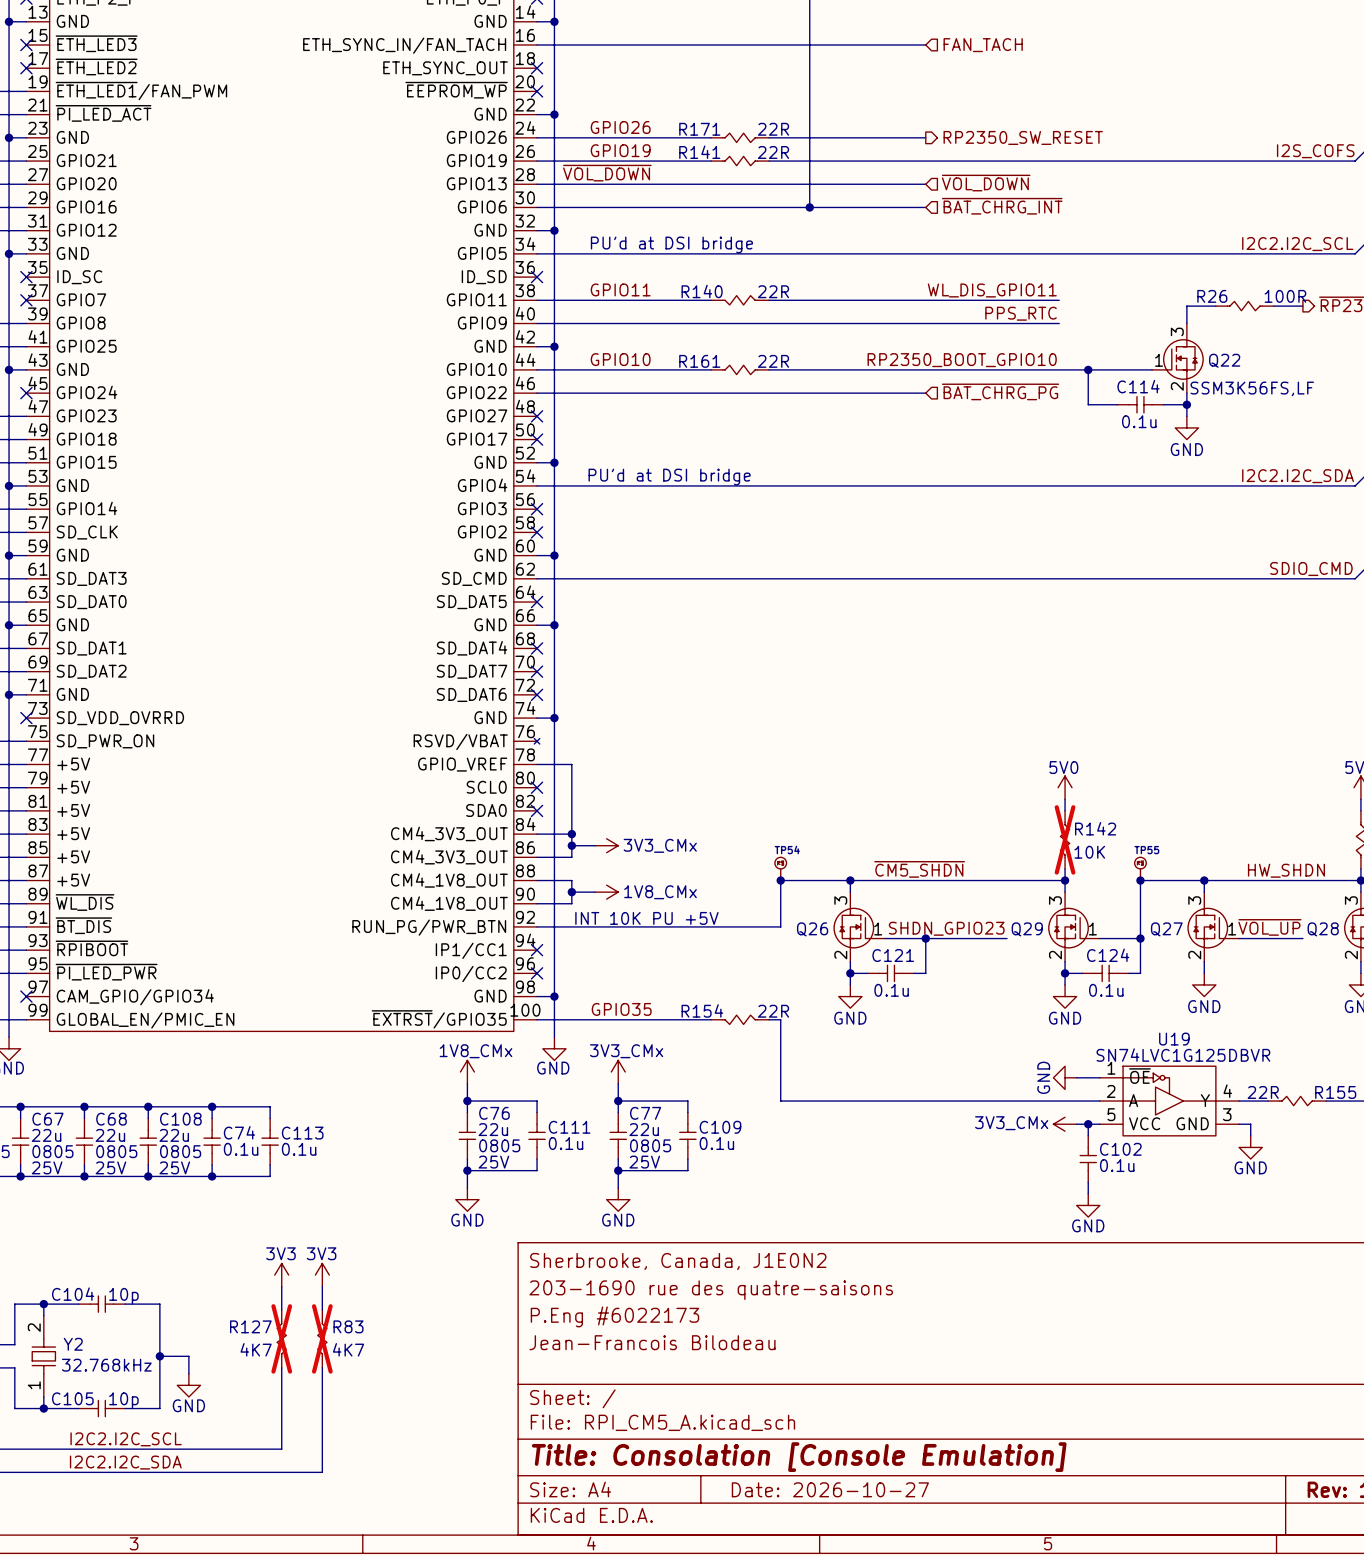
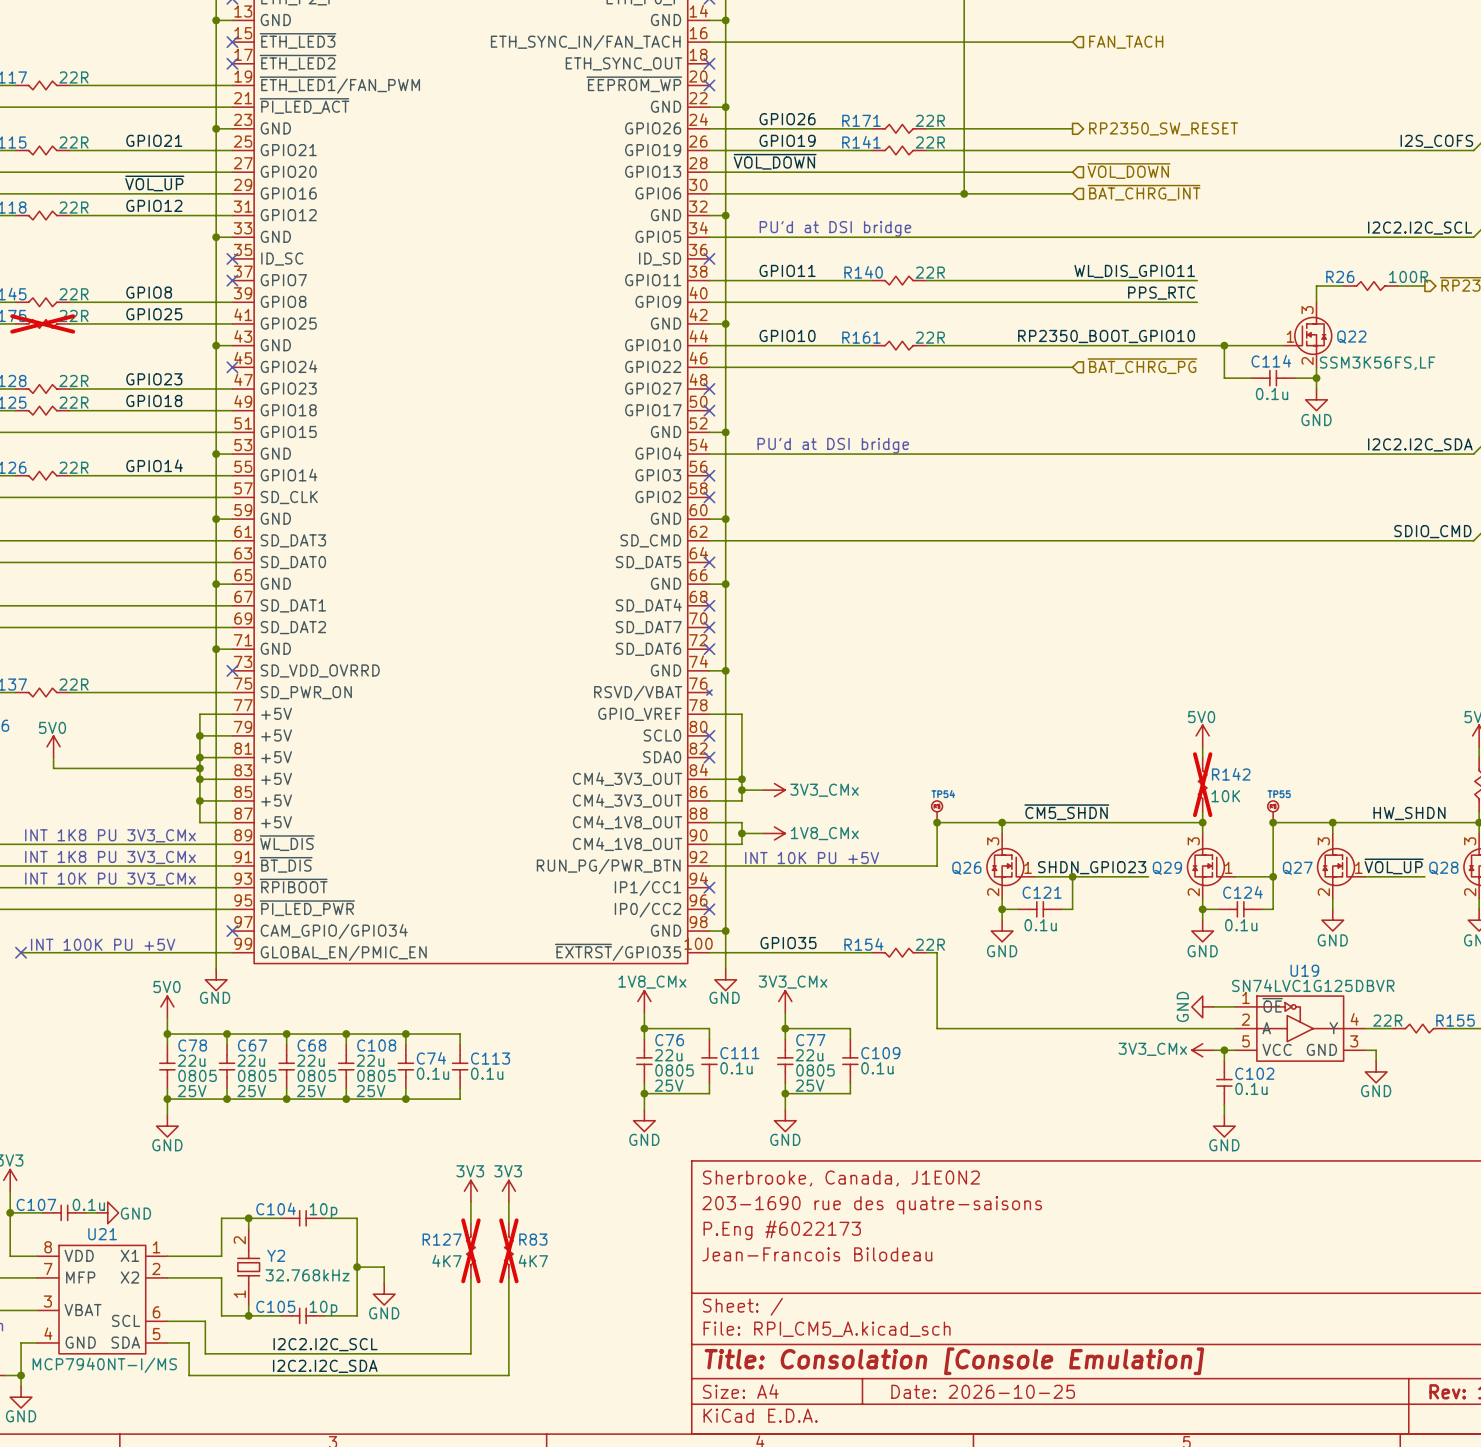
title block: Date: 2026-10-27 (830, 1489) -> Date: 2026-10-25 (983, 1391)

